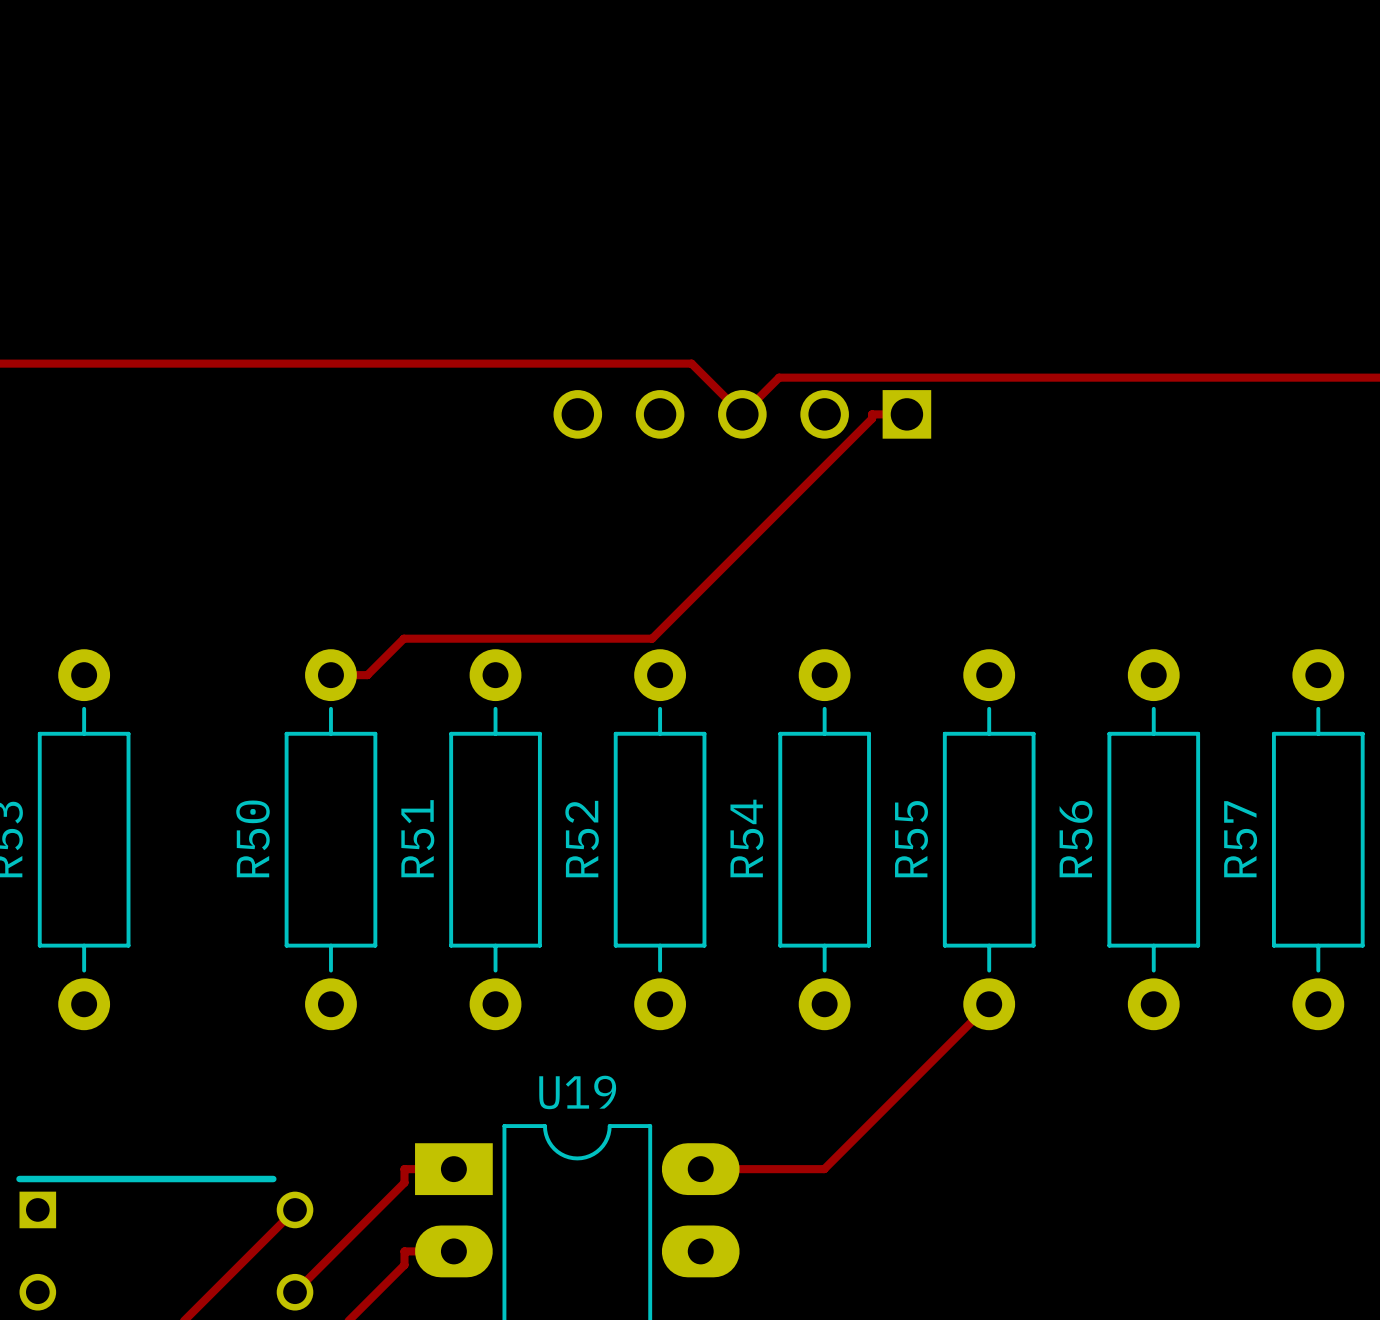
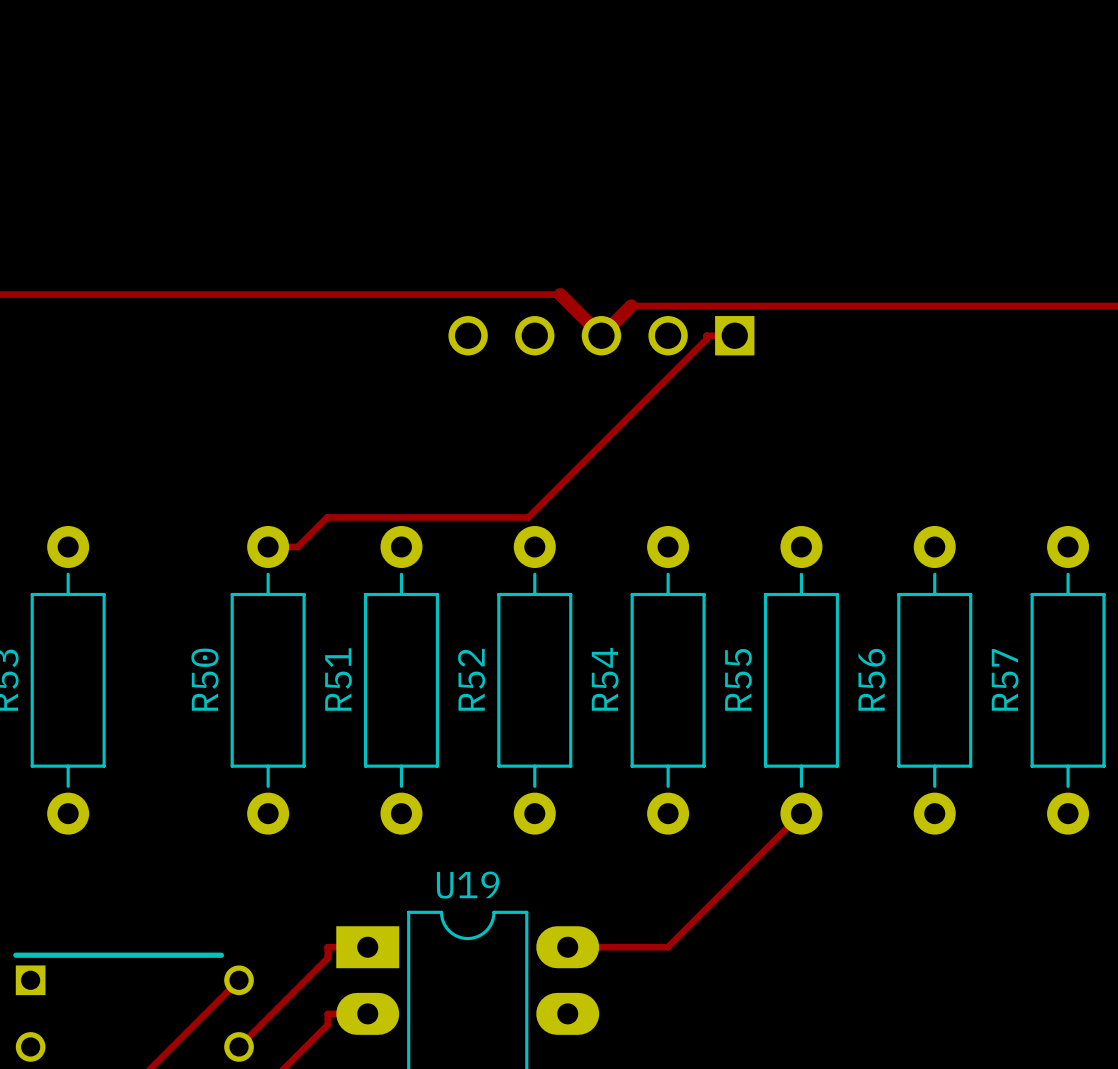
track width: thin (691, 363) (742, 414) (779, 377) -> thick (560, 294) (601, 335) (631, 305)

